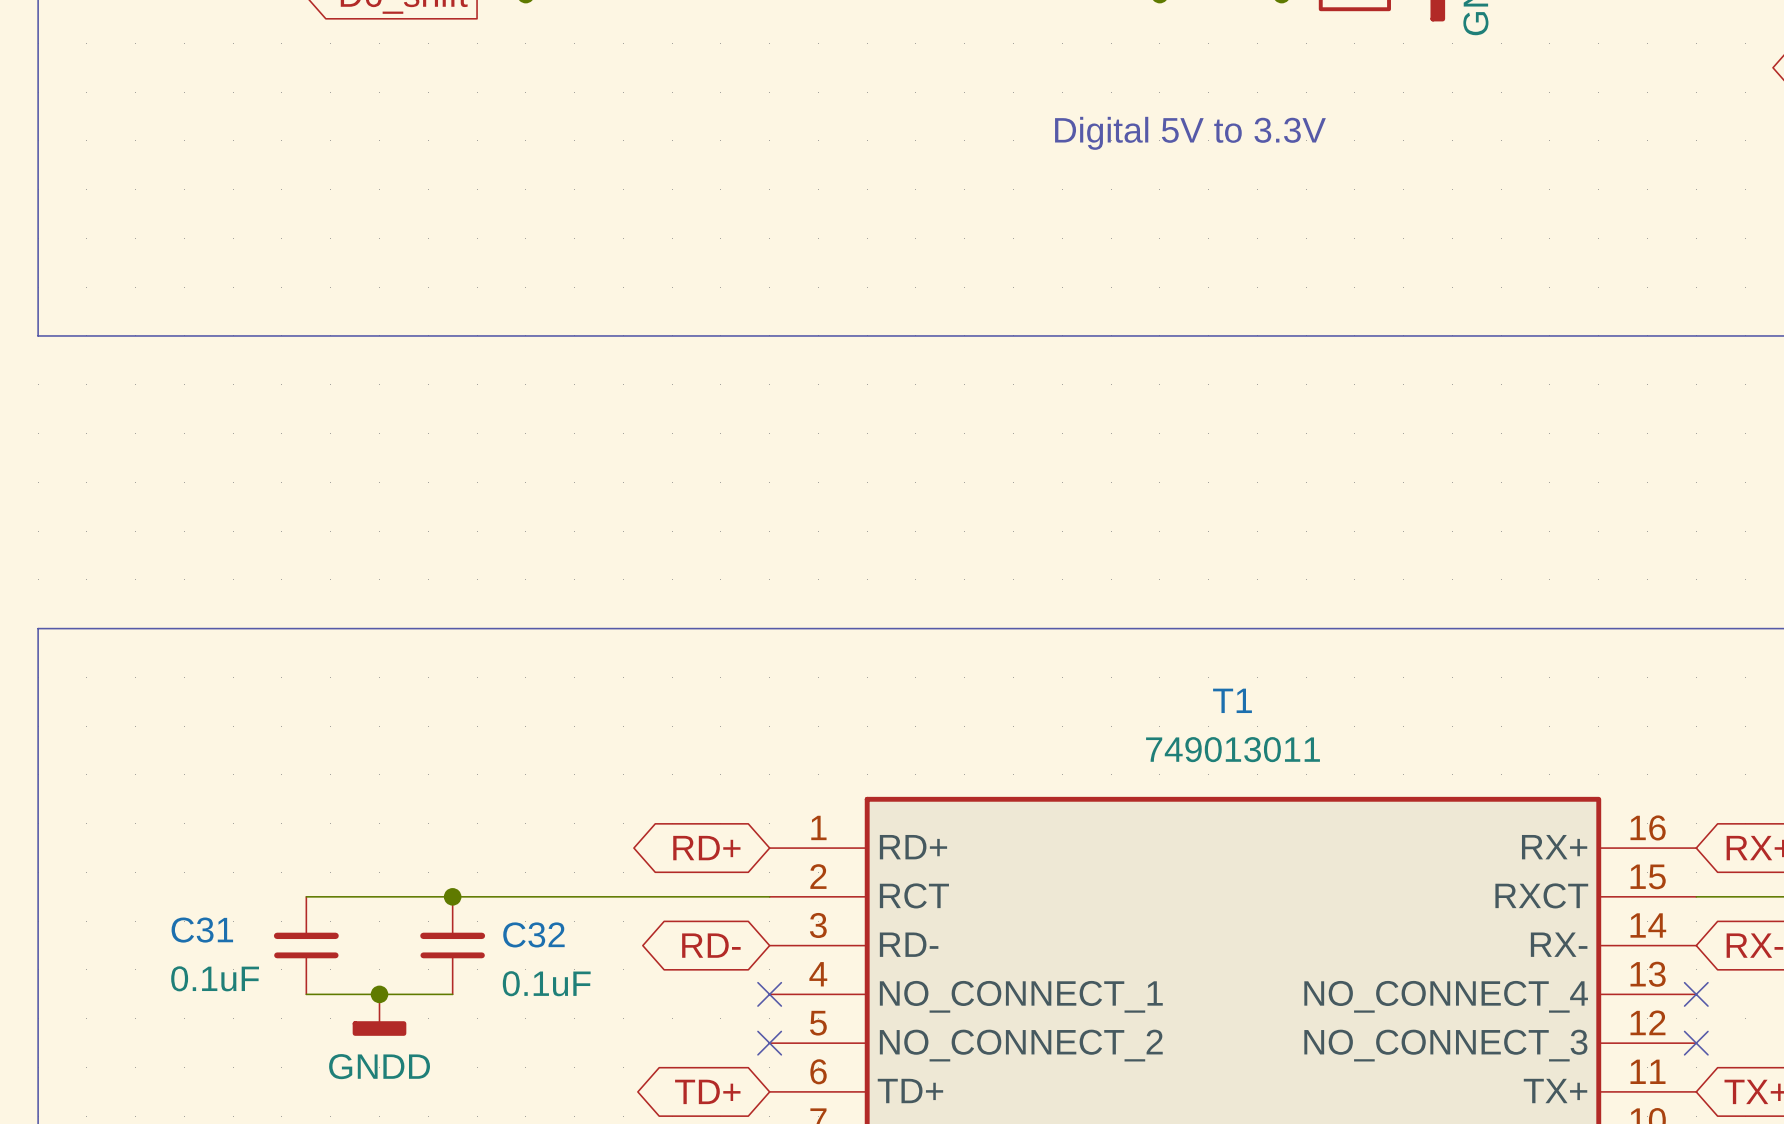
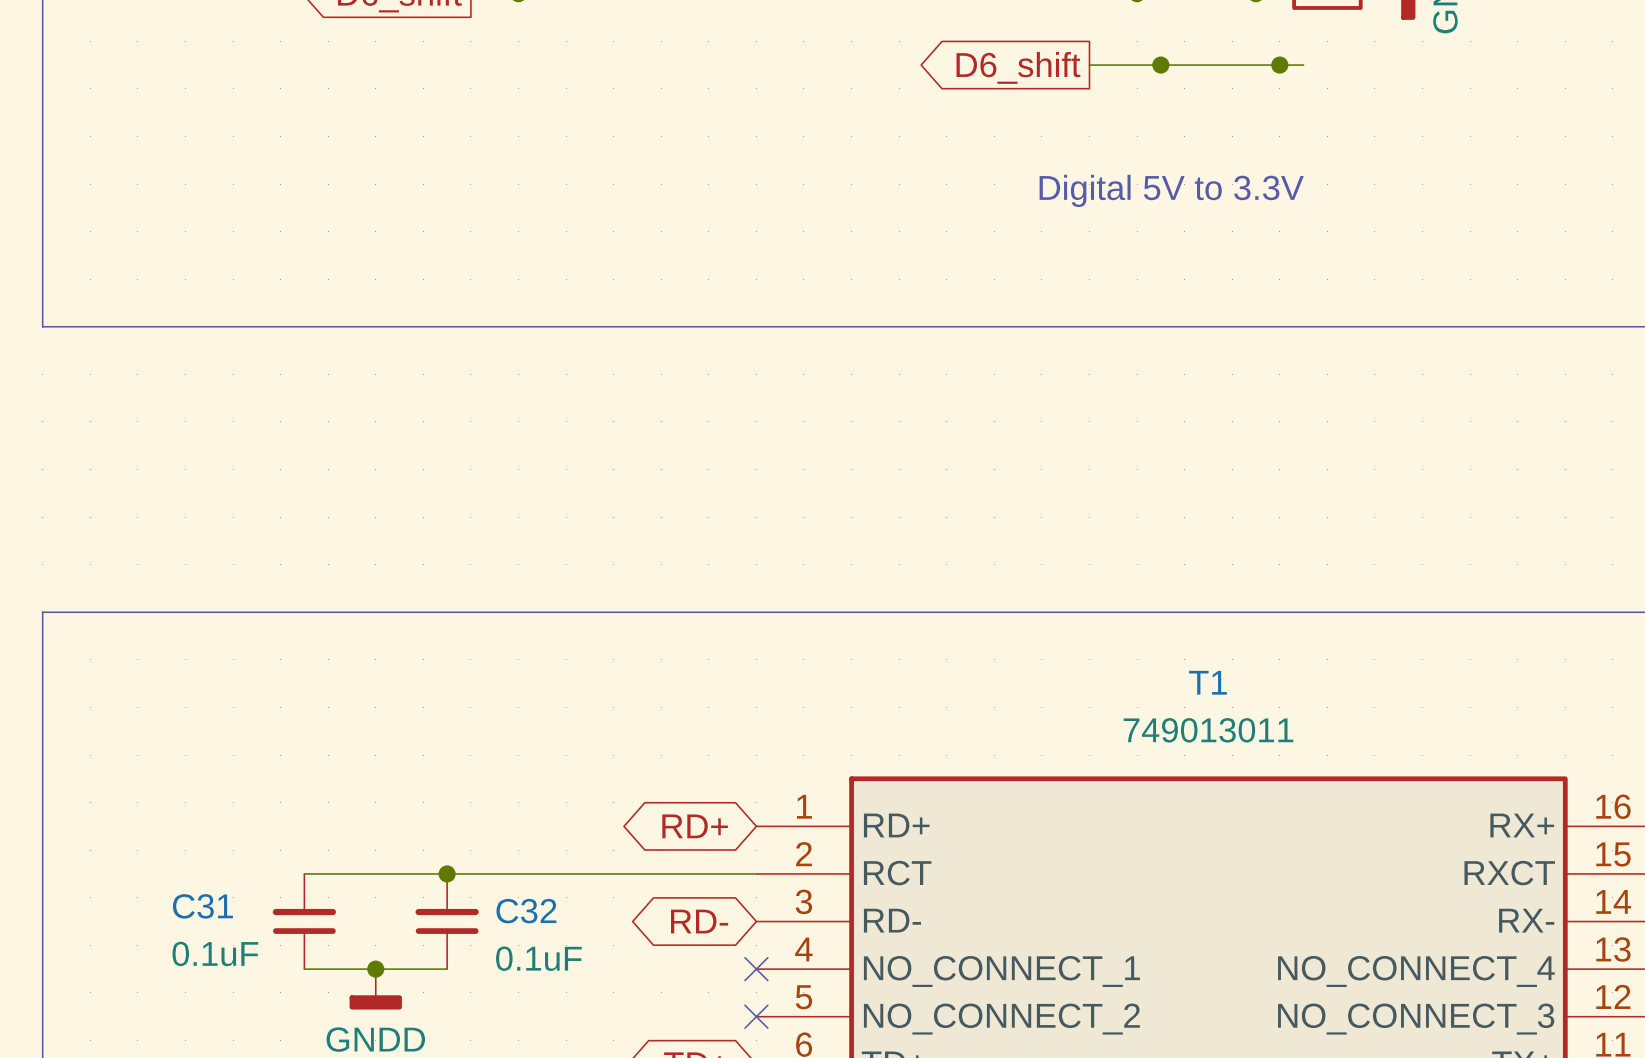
wire: none -> (1089, 65) (1303, 65)
junction: none -> (1160, 65)
junction: none -> (1279, 65)
global label: none -> D6_shift (1018, 67)
text position: Digital 5V to 3.3V (1190, 133) -> Digital 5V to 3.3V (1171, 190)

